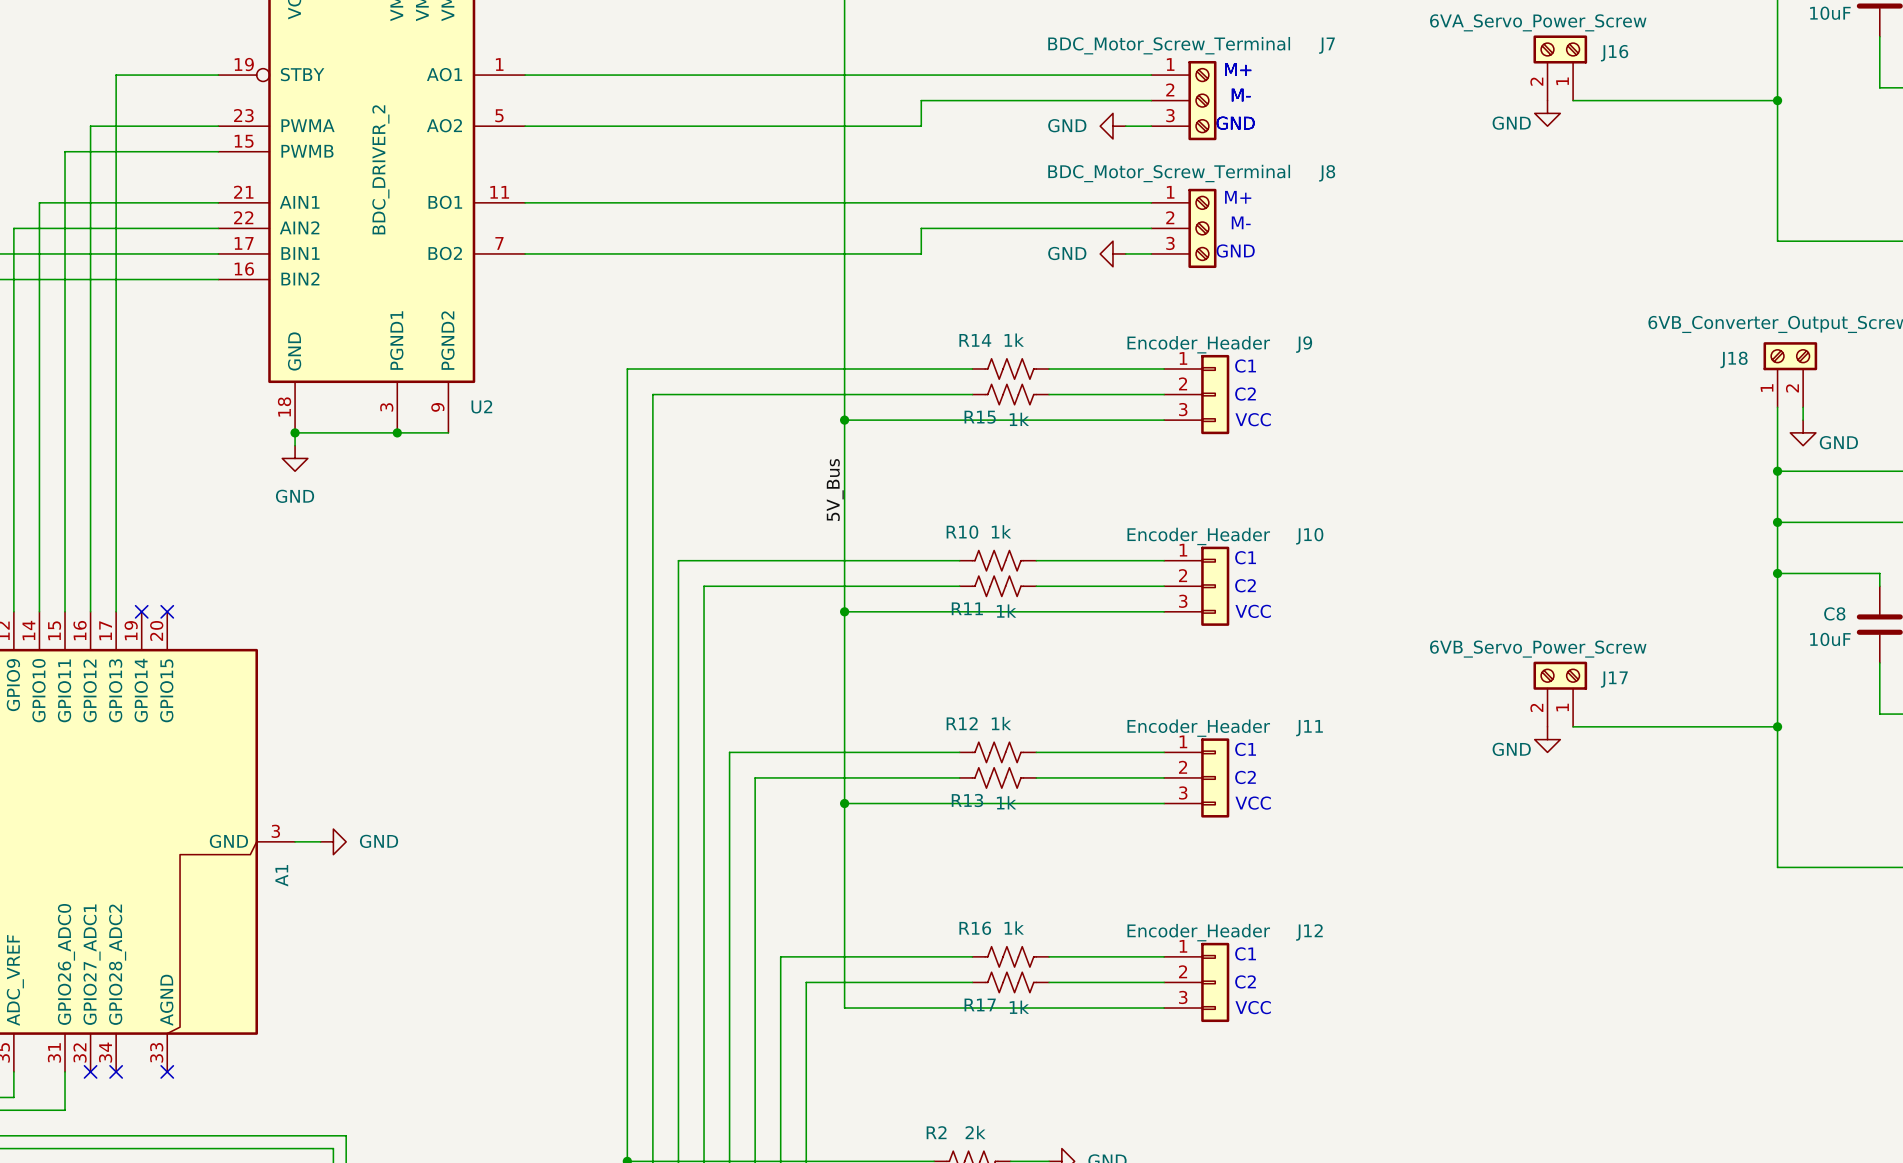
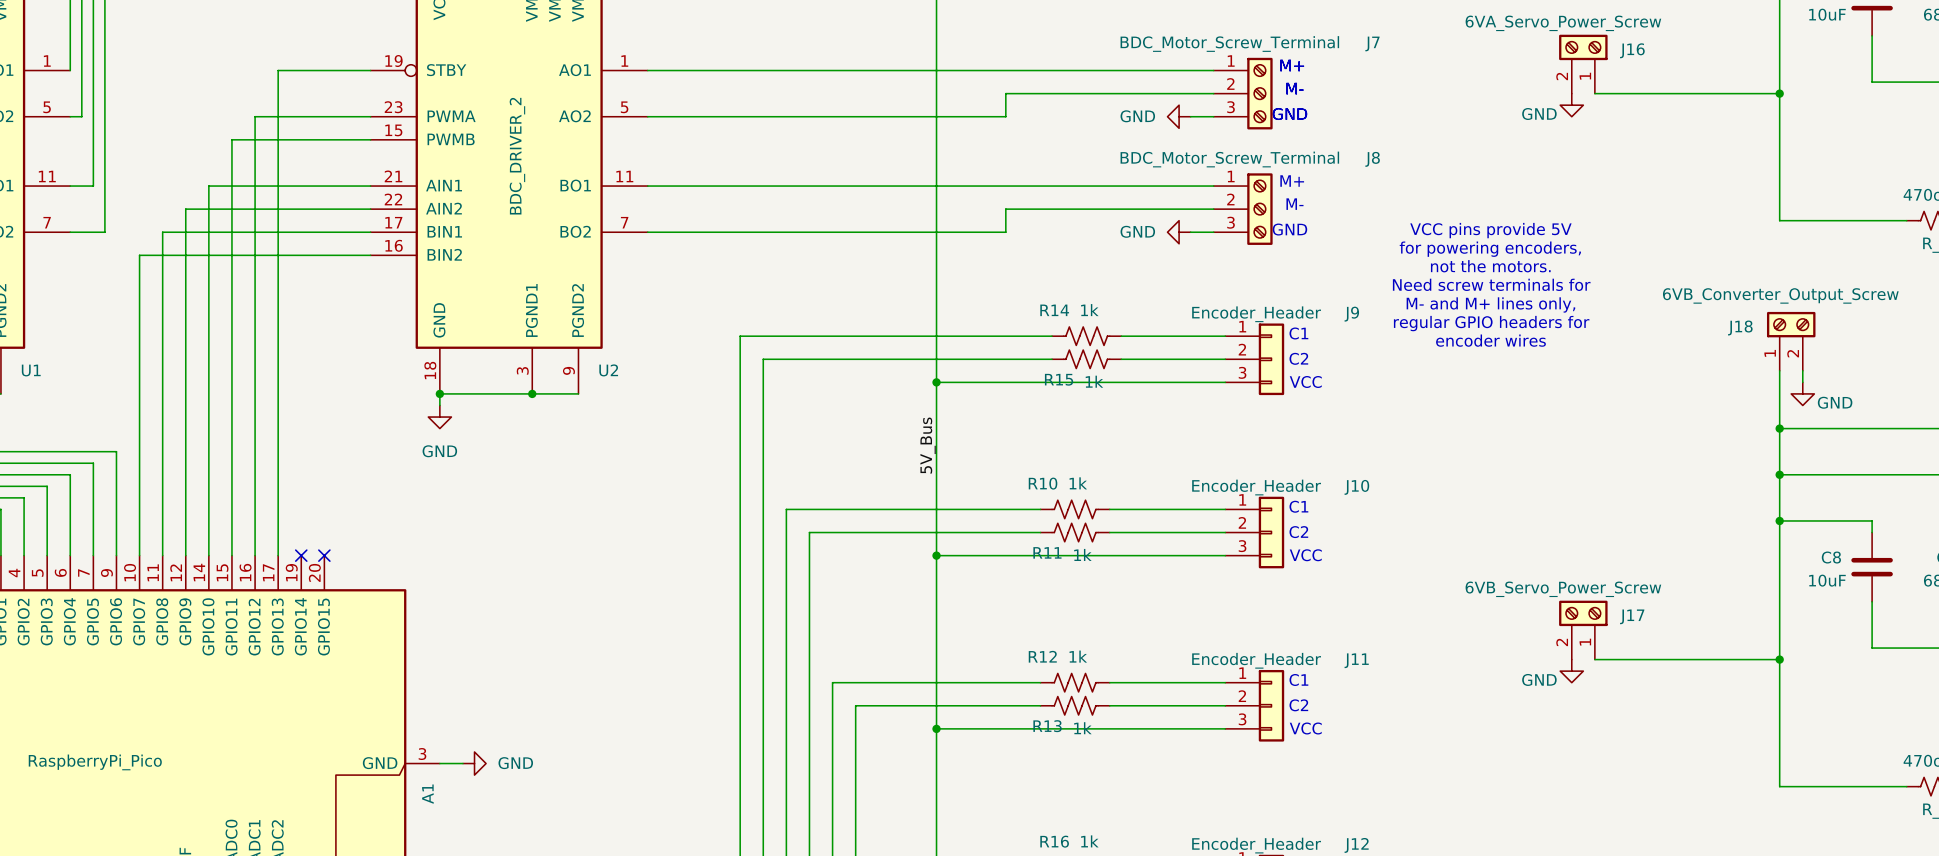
text: none -> VCC pins provide 5V (1490, 230)
text: none -> for powering encoders, (1490, 249)
text: none -> not the motors. (1490, 266)
text: none -> Need screw terminals for (1491, 284)
text: none -> M- and M+ lines only, (1490, 304)
text: none -> regular GPIO headers for (1491, 323)
text: none -> encoder wires (1490, 340)

